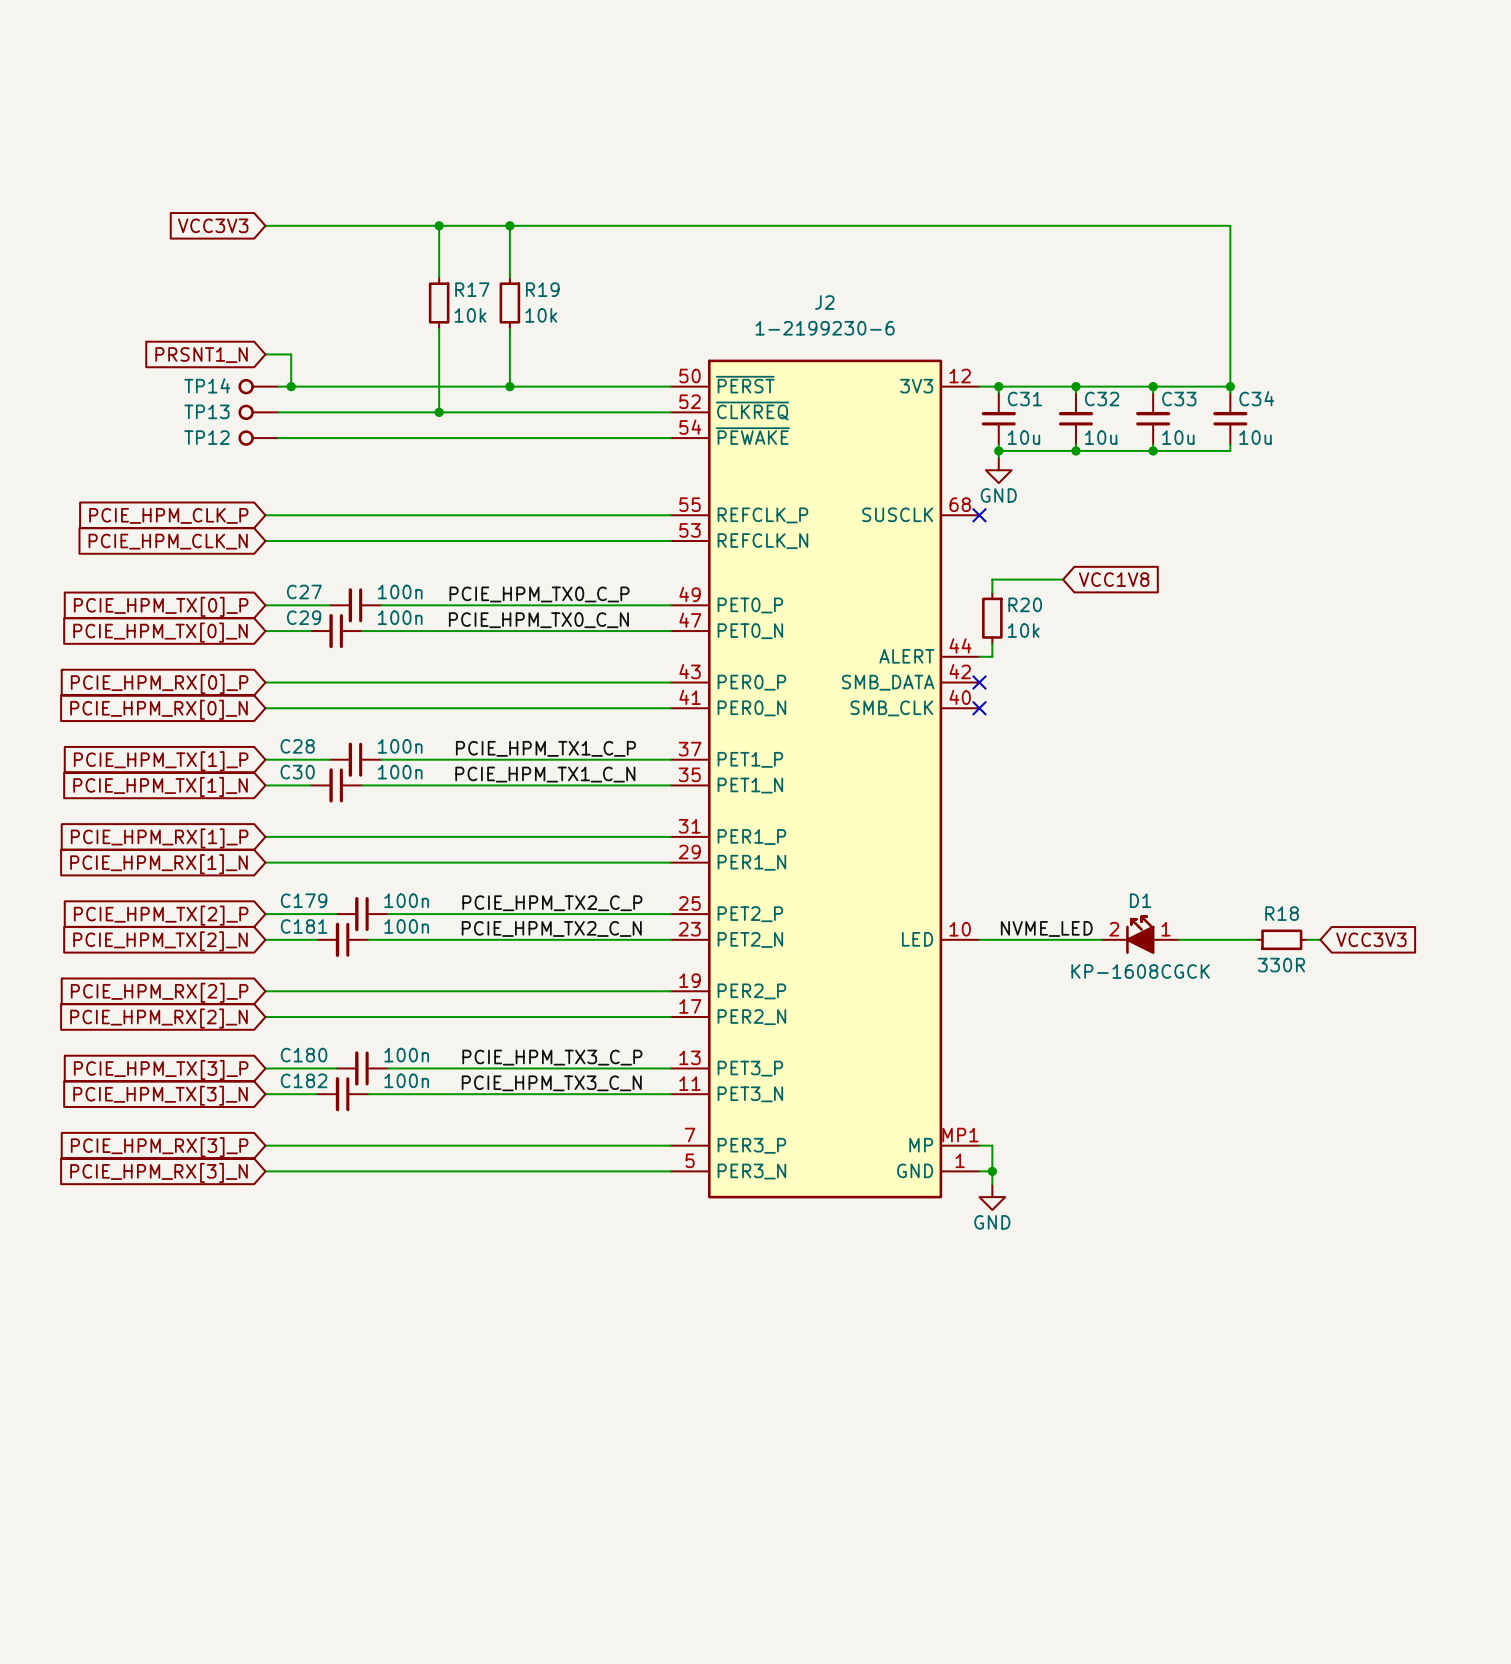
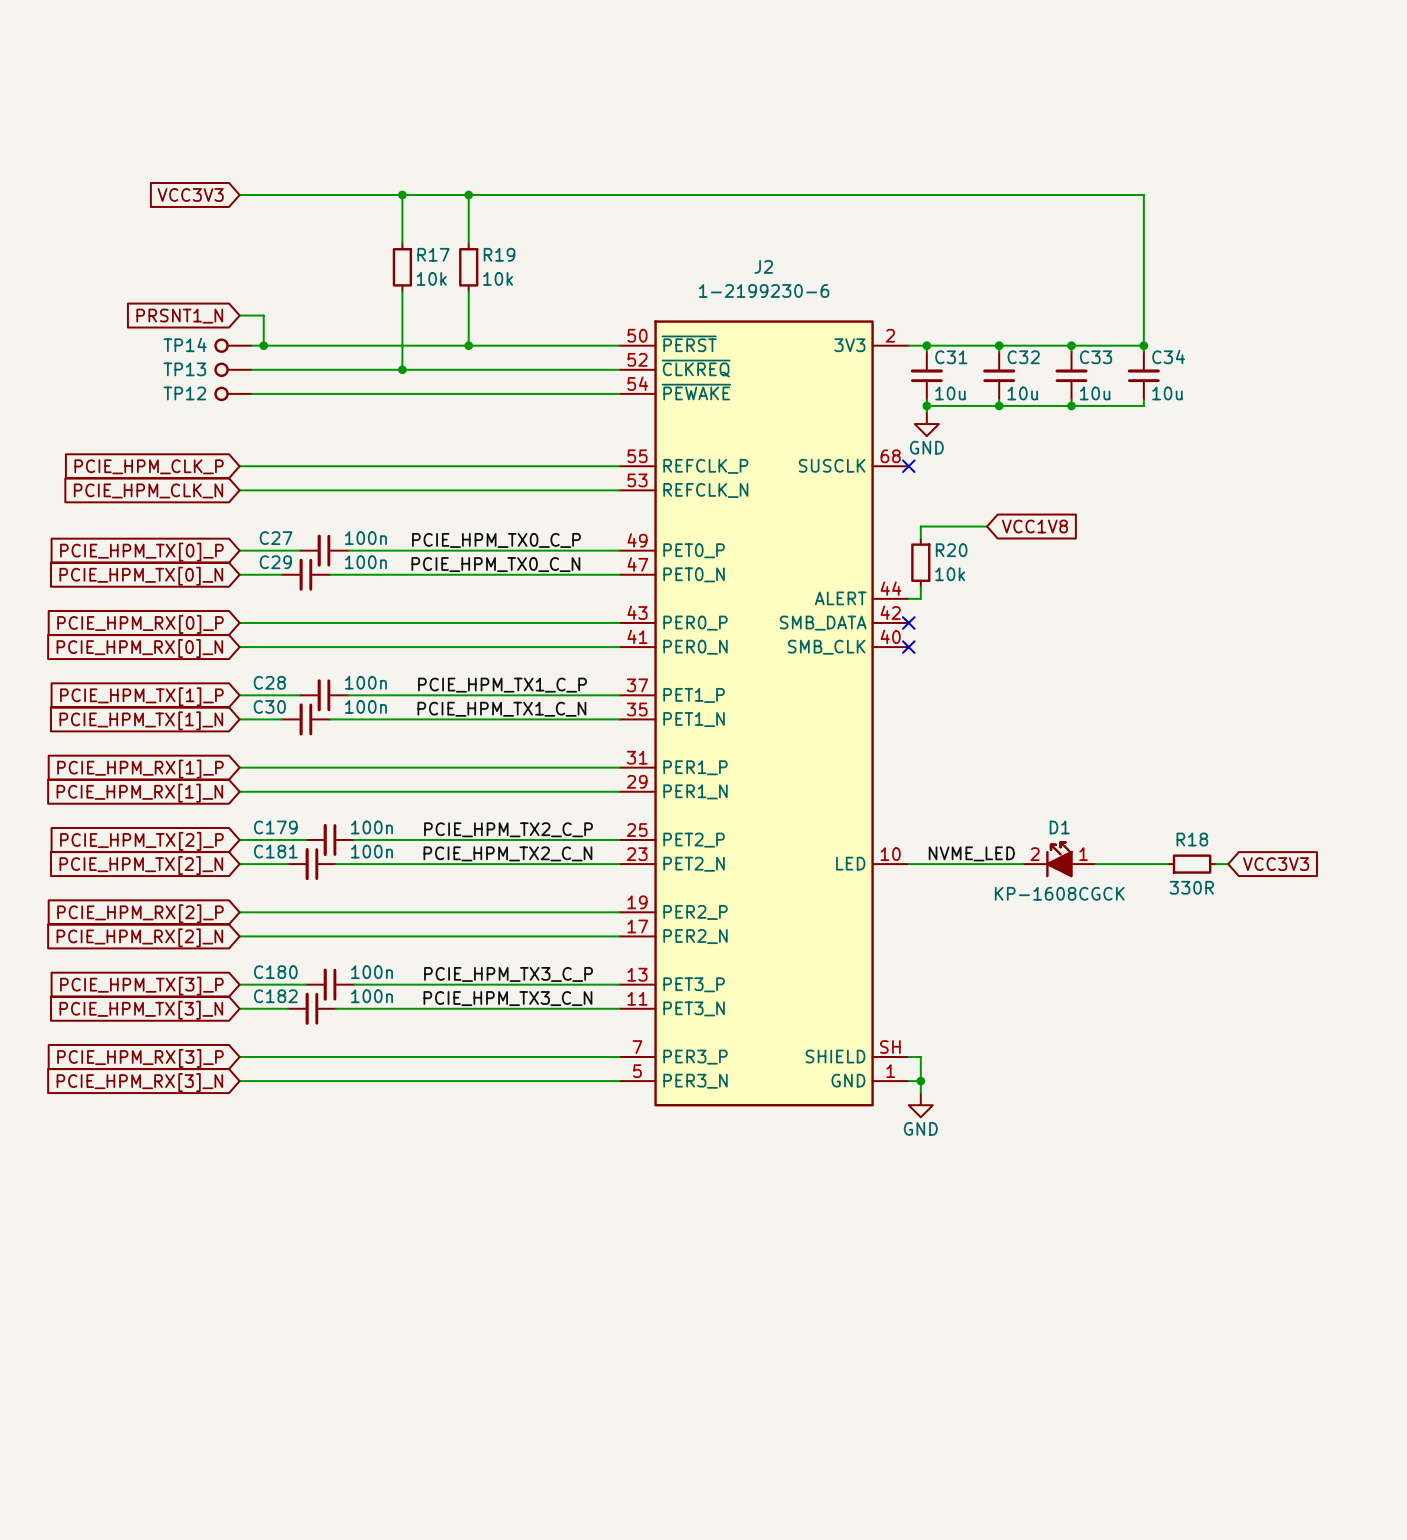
J2 pin number: 12 (960, 376) -> 2 (890, 335)
J2 pin number: MP1 (960, 1135) -> SH (890, 1047)
J2 pin name: MP (921, 1145) -> SHIELD (835, 1056)

